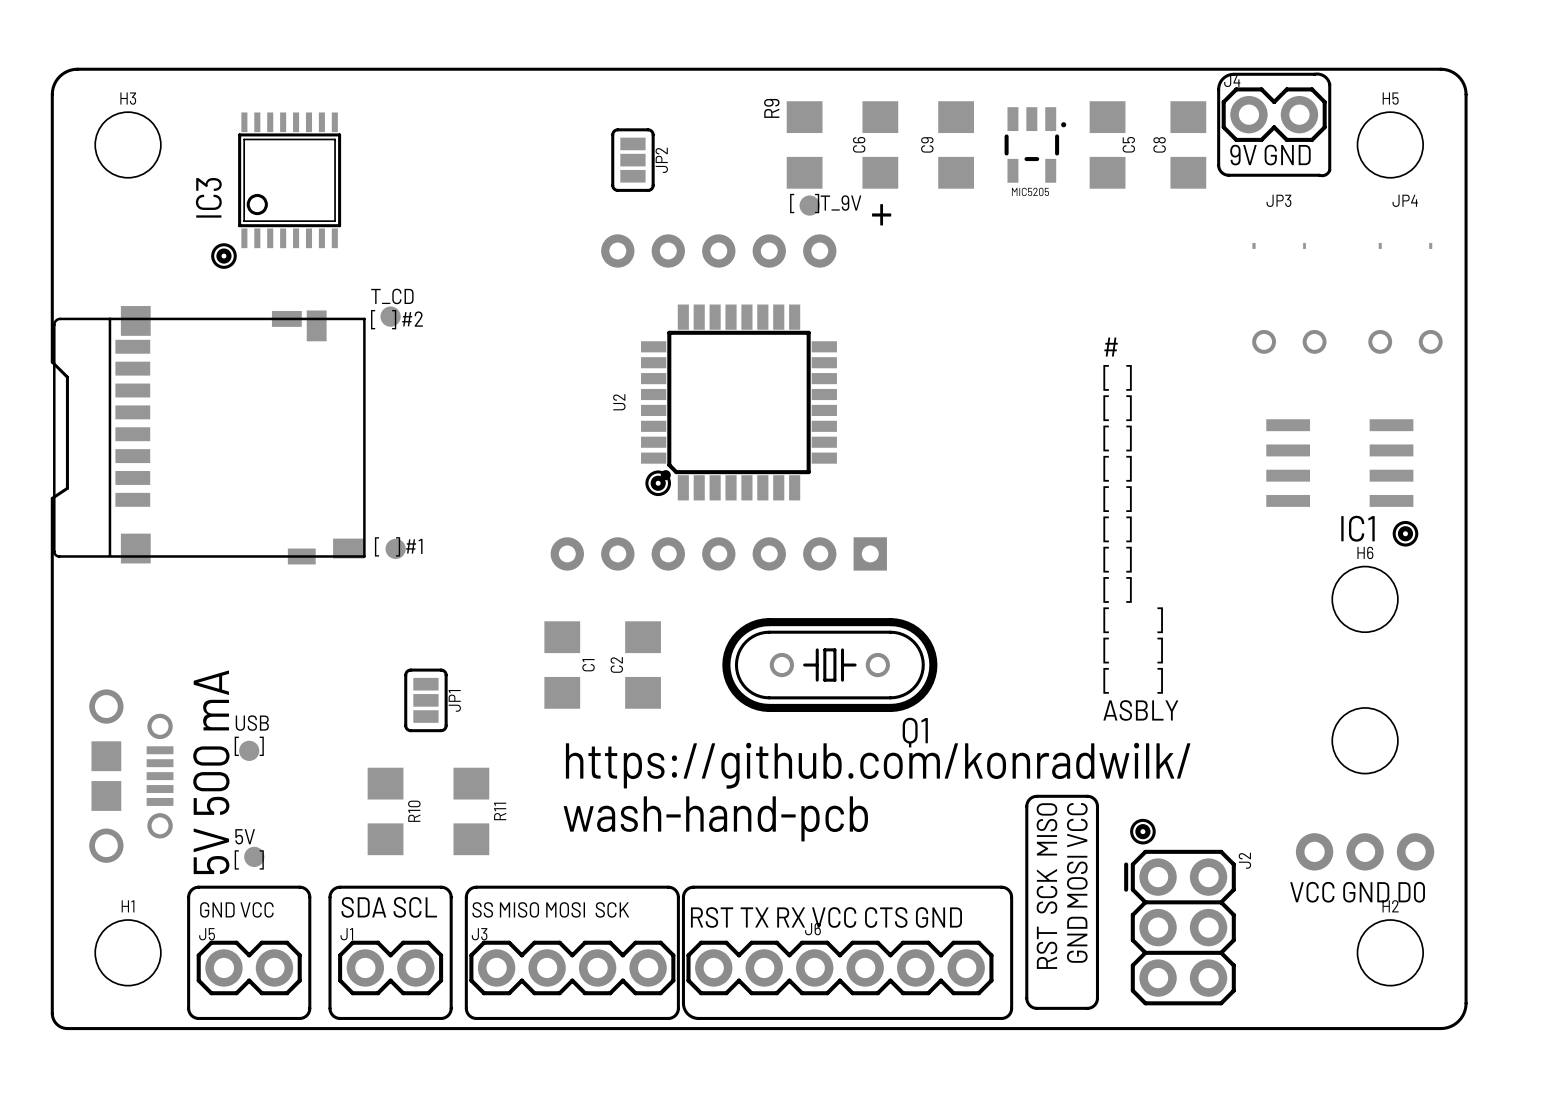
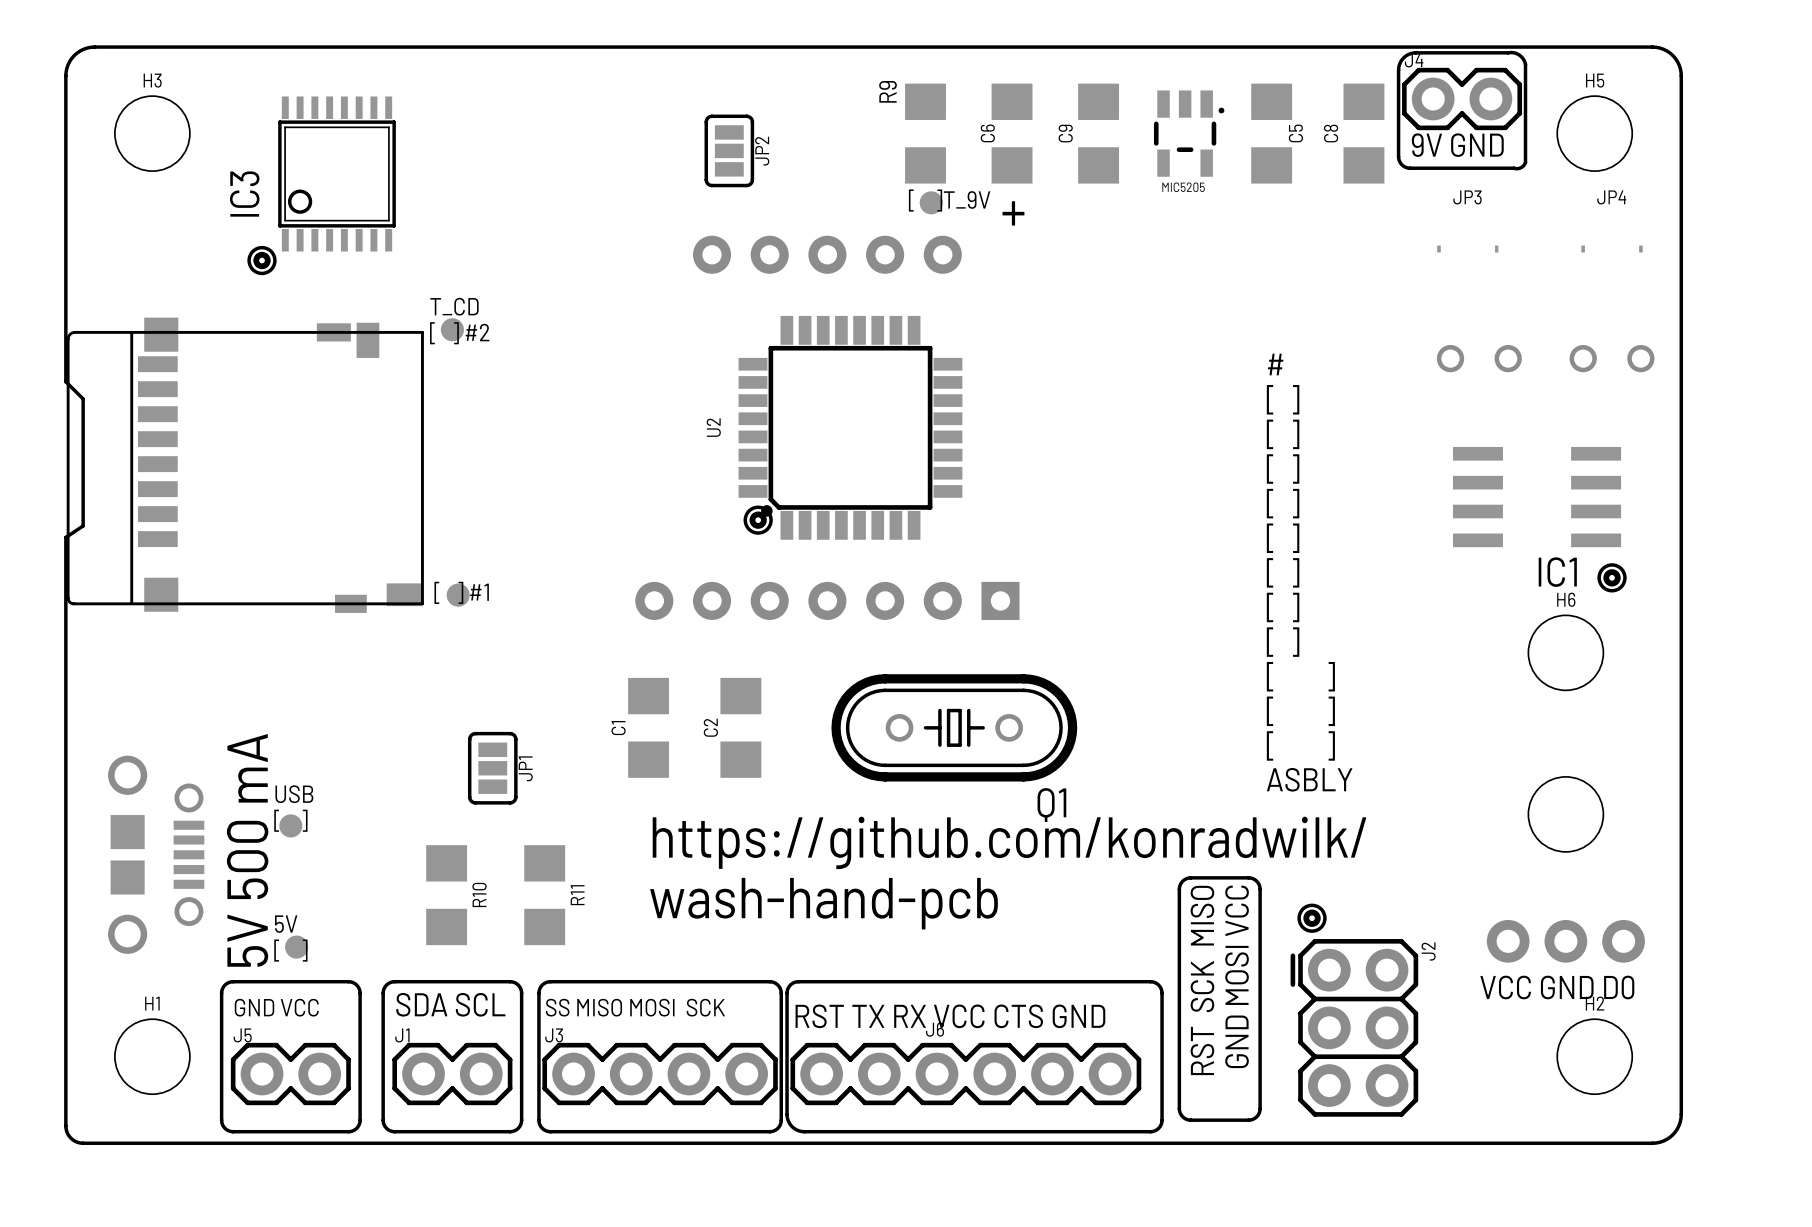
C1 name position: C1 (588, 665) -> C1 (618, 728)

